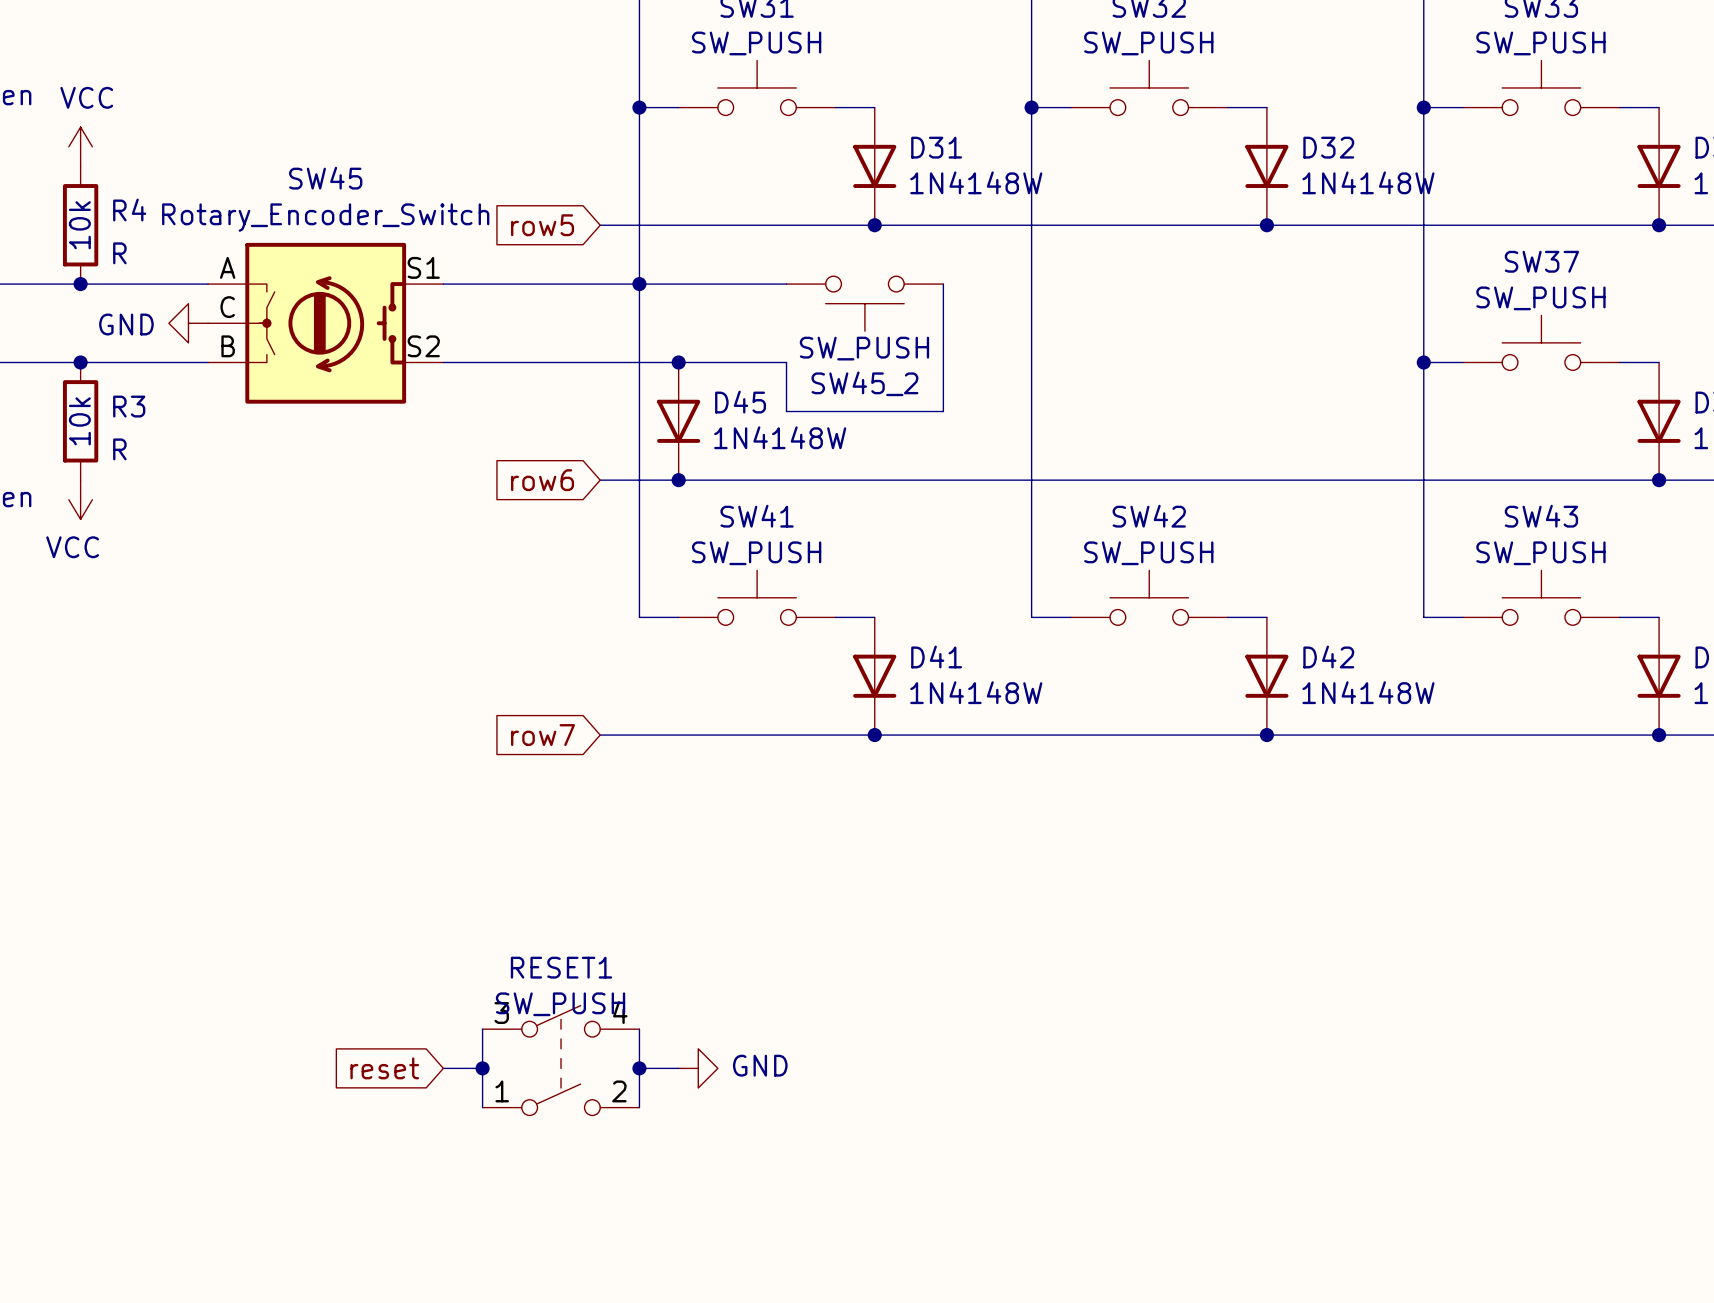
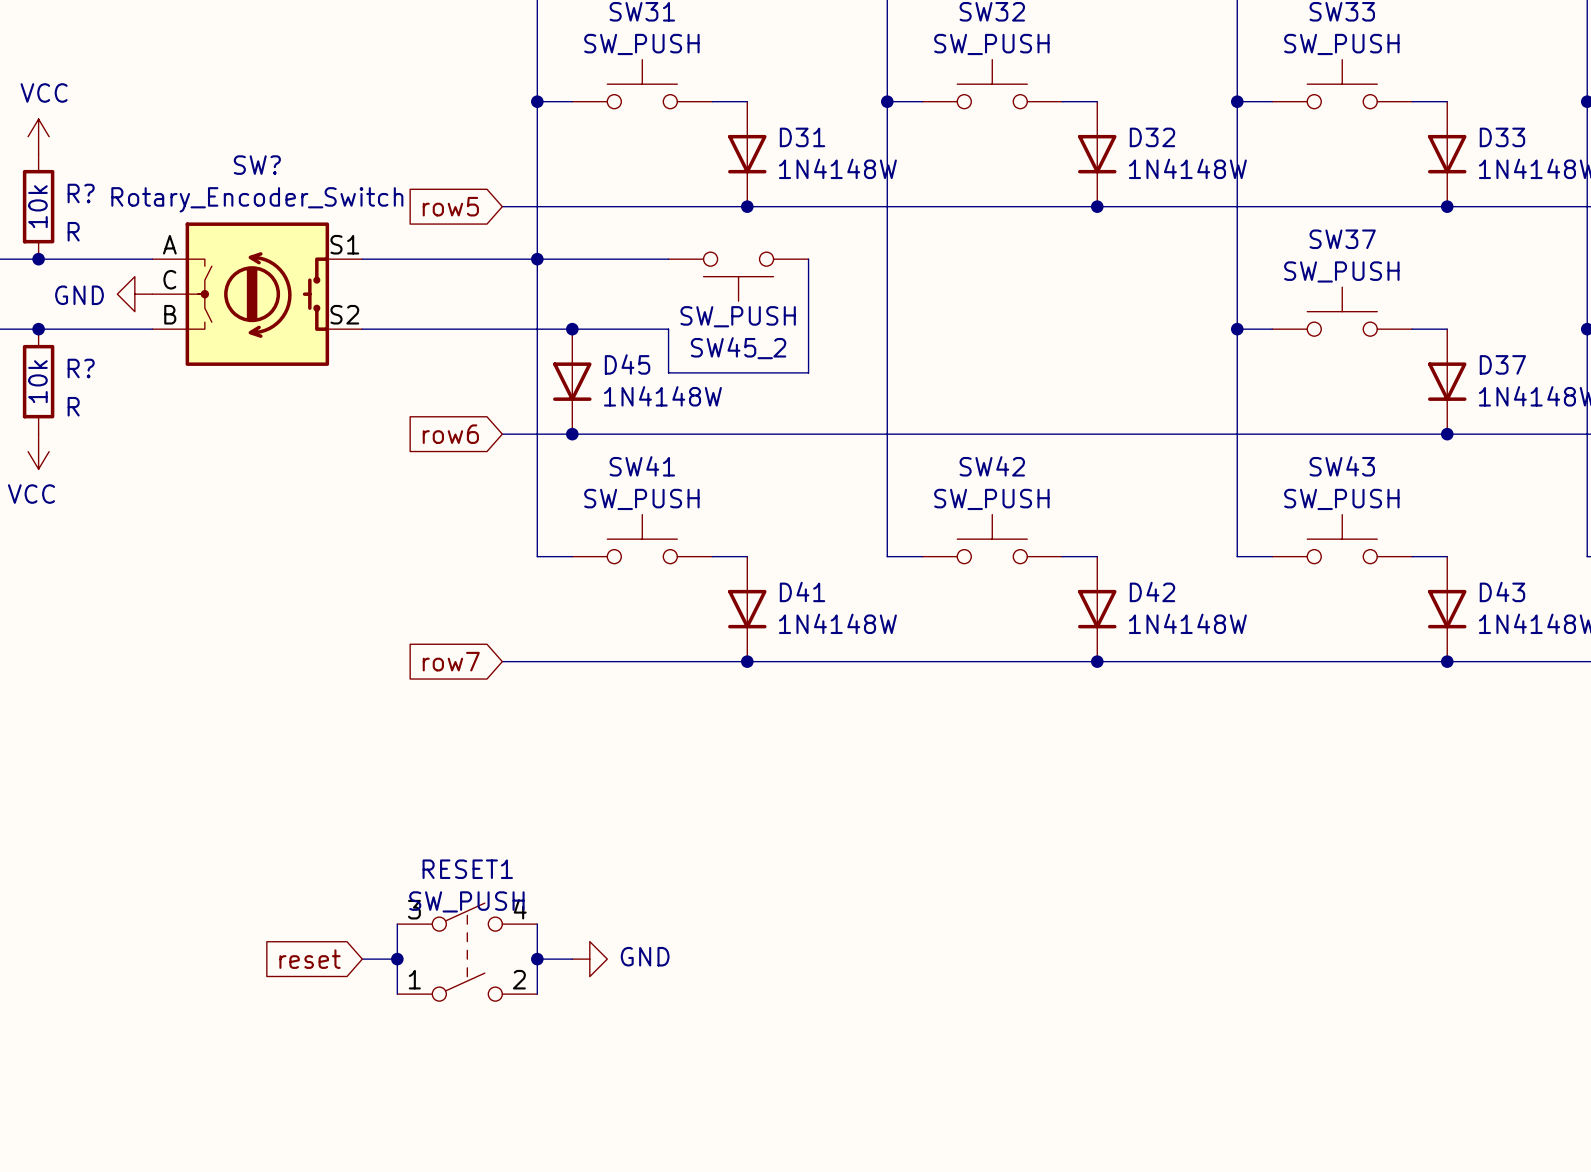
SW45 name: SW45 (325, 178) -> SW? (257, 165)
R4 name: R4 (129, 210) -> R? (81, 193)
R3 name: R3 (129, 406) -> R? (81, 368)

